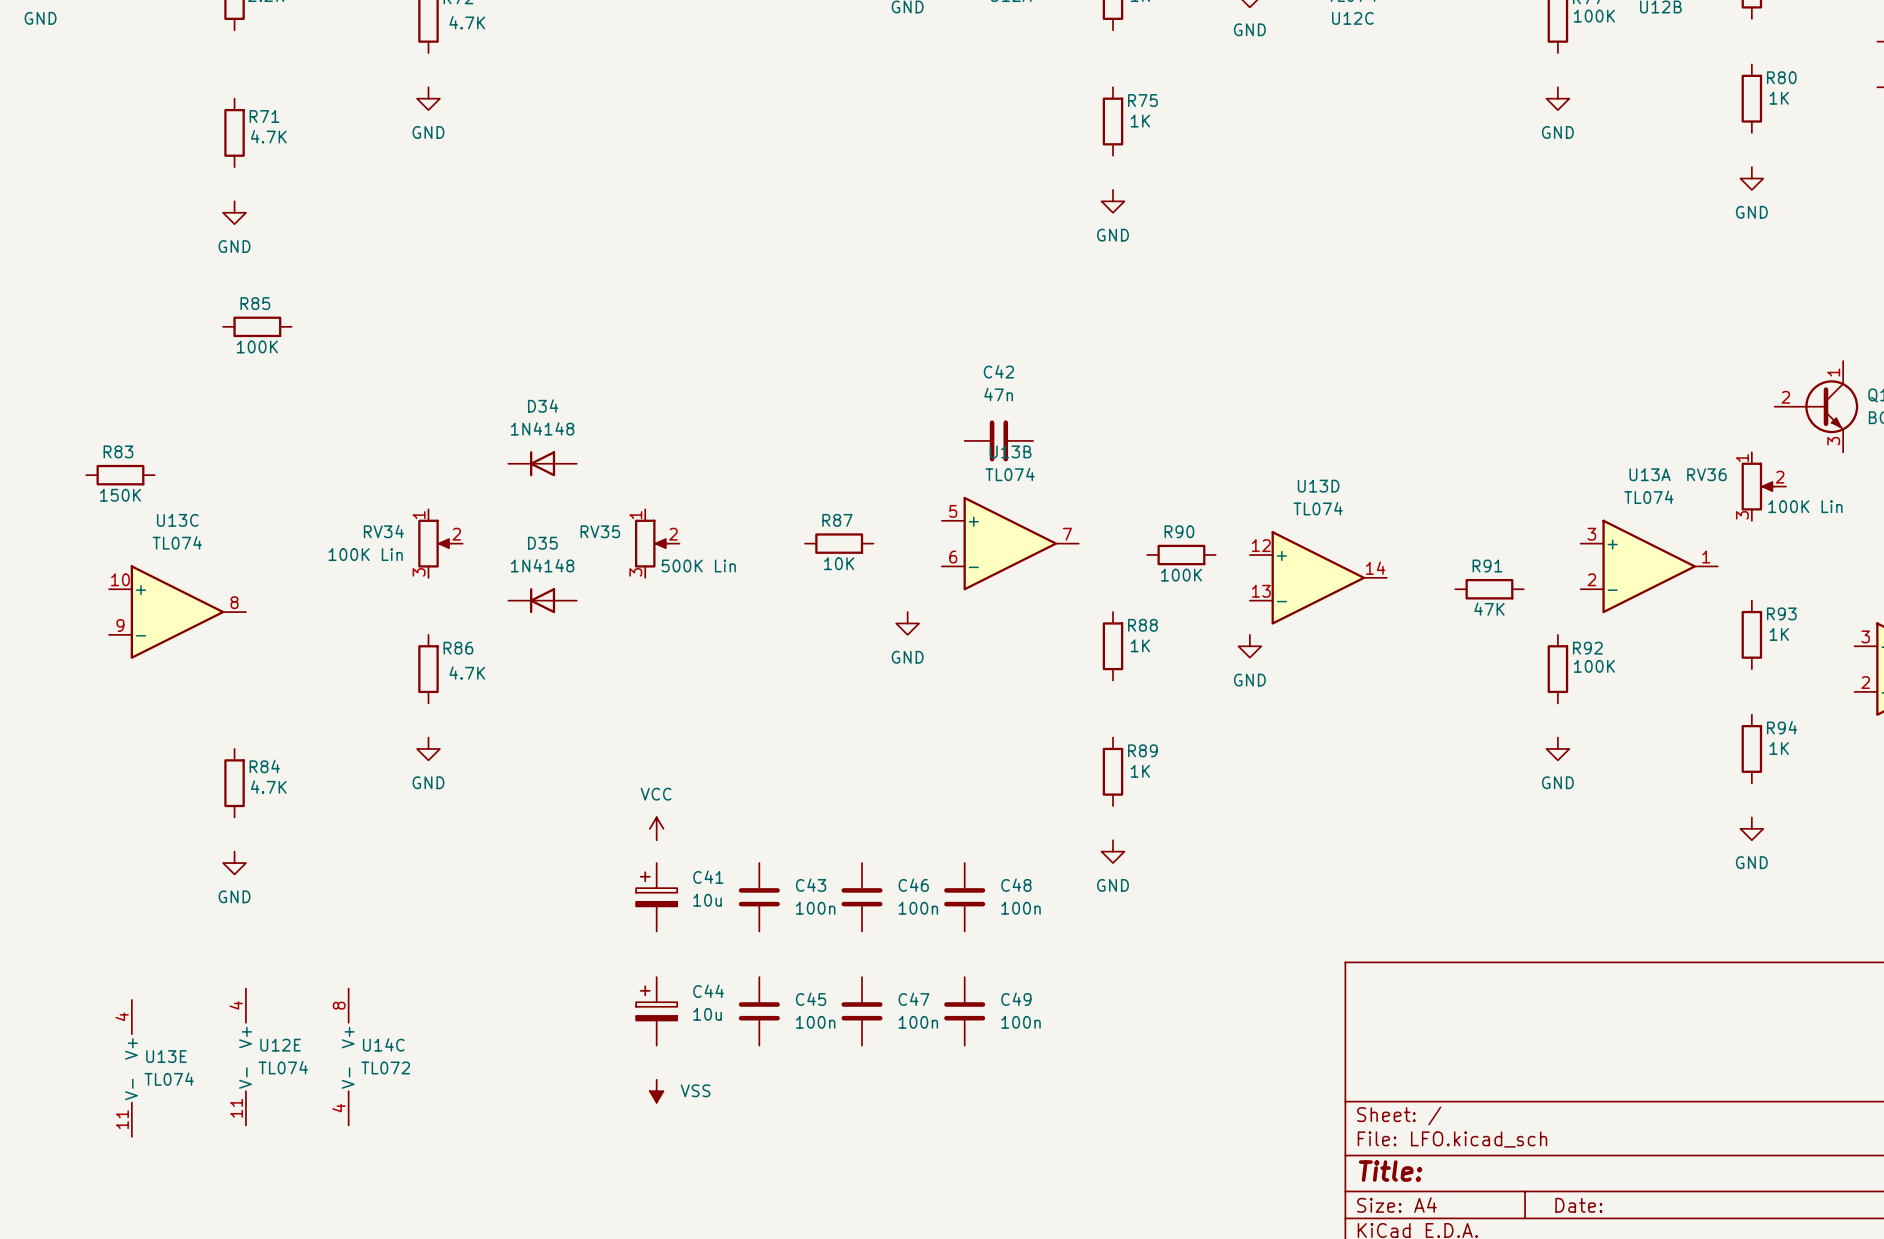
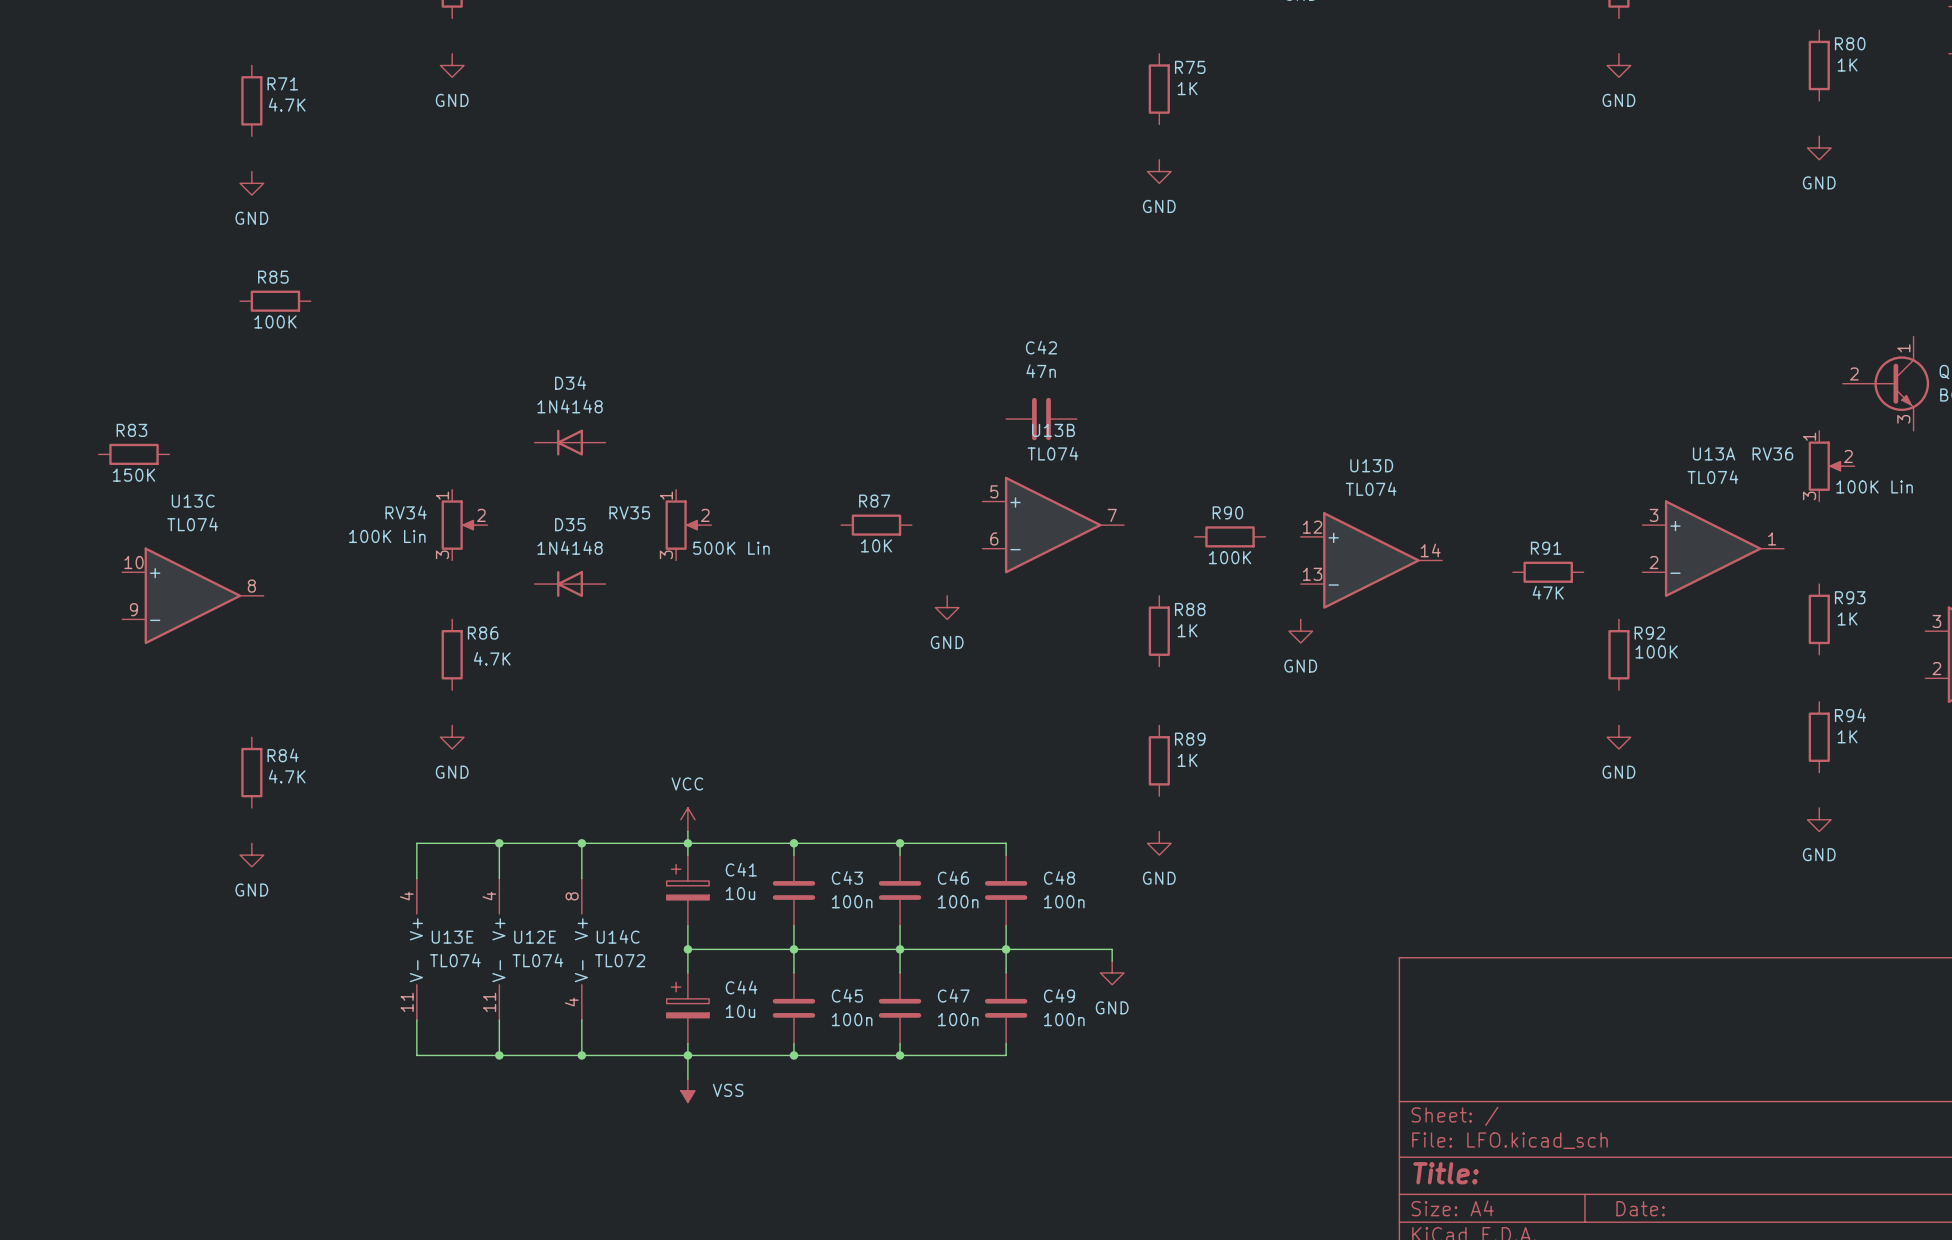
wire: none -> (687, 831) (687, 855)
wire: none -> (499, 843) (499, 878)
junction: none -> (499, 843)
wire: none -> (581, 843) (581, 878)
junction: none -> (581, 843)
junction: none -> (687, 843)
wire: none -> (793, 843) (793, 855)
junction: none -> (793, 843)
wire: none -> (900, 843) (900, 855)
junction: none -> (900, 843)
wire: none -> (1006, 855) (1006, 843) (416, 843) (416, 878)
wire: none -> (687, 925) (687, 972)
wire: none -> (793, 925) (793, 972)
wire: none -> (900, 925) (900, 972)
wire: none -> (1006, 925) (1006, 972)
wire: none -> (687, 949) (1112, 949) (1112, 961)
junction: none -> (687, 949)
junction: none -> (793, 949)
junction: none -> (900, 949)
junction: none -> (1006, 949)
power symbol: none -> GND (1112, 972)
wire: none -> (416, 1020) (416, 1055) (1006, 1055) (1006, 1043)
wire: none -> (499, 1020) (499, 1055)
wire: none -> (581, 1020) (581, 1055)
wire: none -> (687, 1043) (687, 1079)
wire: none -> (793, 1043) (793, 1055)
wire: none -> (900, 1043) (900, 1055)
U12E position: (245, 1056) -> (499, 949)
U14C position: (348, 1056) -> (581, 949)
junction: none -> (499, 1055)
junction: none -> (581, 1055)
junction: none -> (687, 1055)
junction: none -> (793, 1055)
junction: none -> (900, 1055)
U13E position: (131, 1068) -> (416, 949)

